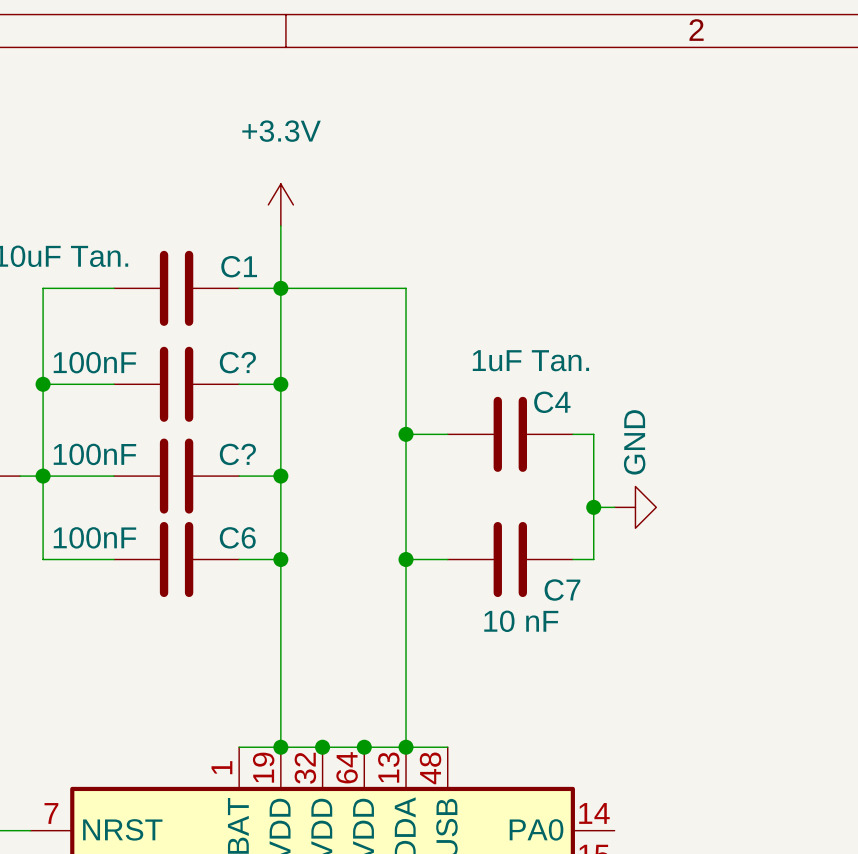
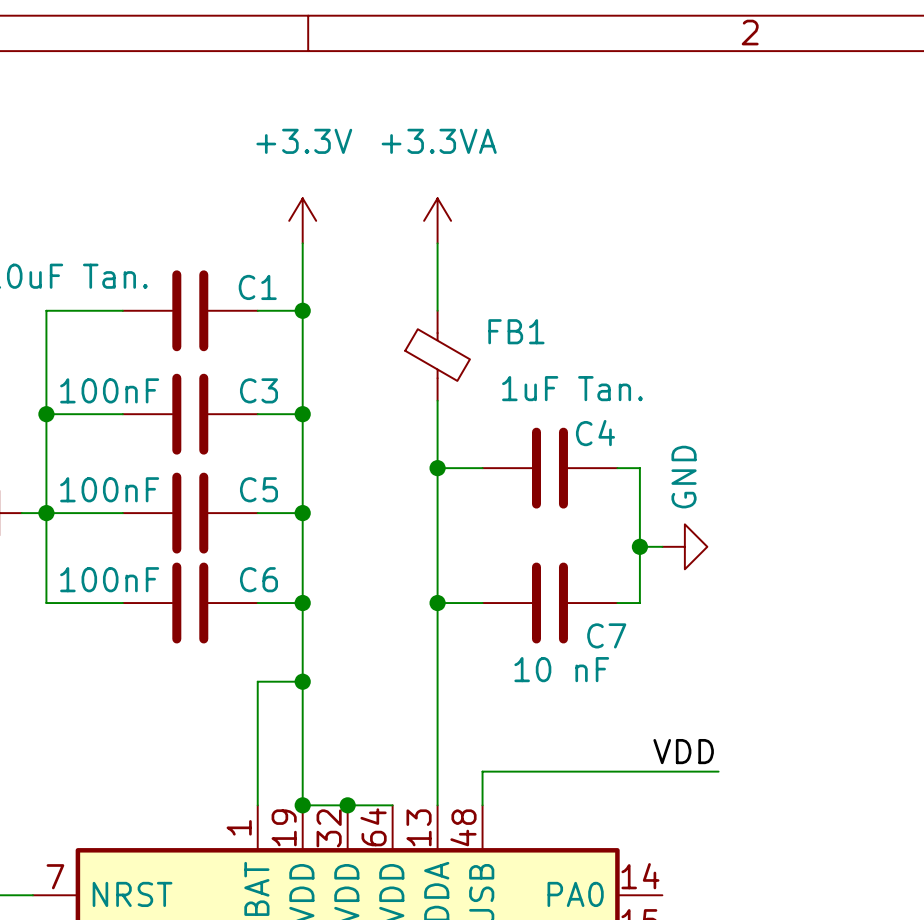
power symbol: none -> +3.3VA (437, 220)
wire: none -> (437, 243) (437, 310)
wire: (280, 288) (406, 288) (406, 371) -> none
FB1: none -> (437, 355)
C? name: C? (237, 362) -> C3 (258, 390)
C? name: C? (237, 454) -> C5 (258, 489)
junction: none -> (302, 681)
label: none -> VDD (683, 751)
wire: (239, 747) (280, 747) -> (257, 805) (257, 681) (302, 681)
wire: (364, 747) (447, 747) -> (718, 771) (482, 771) (482, 805)
junction: (364, 747) -> none
junction: (406, 747) -> none

